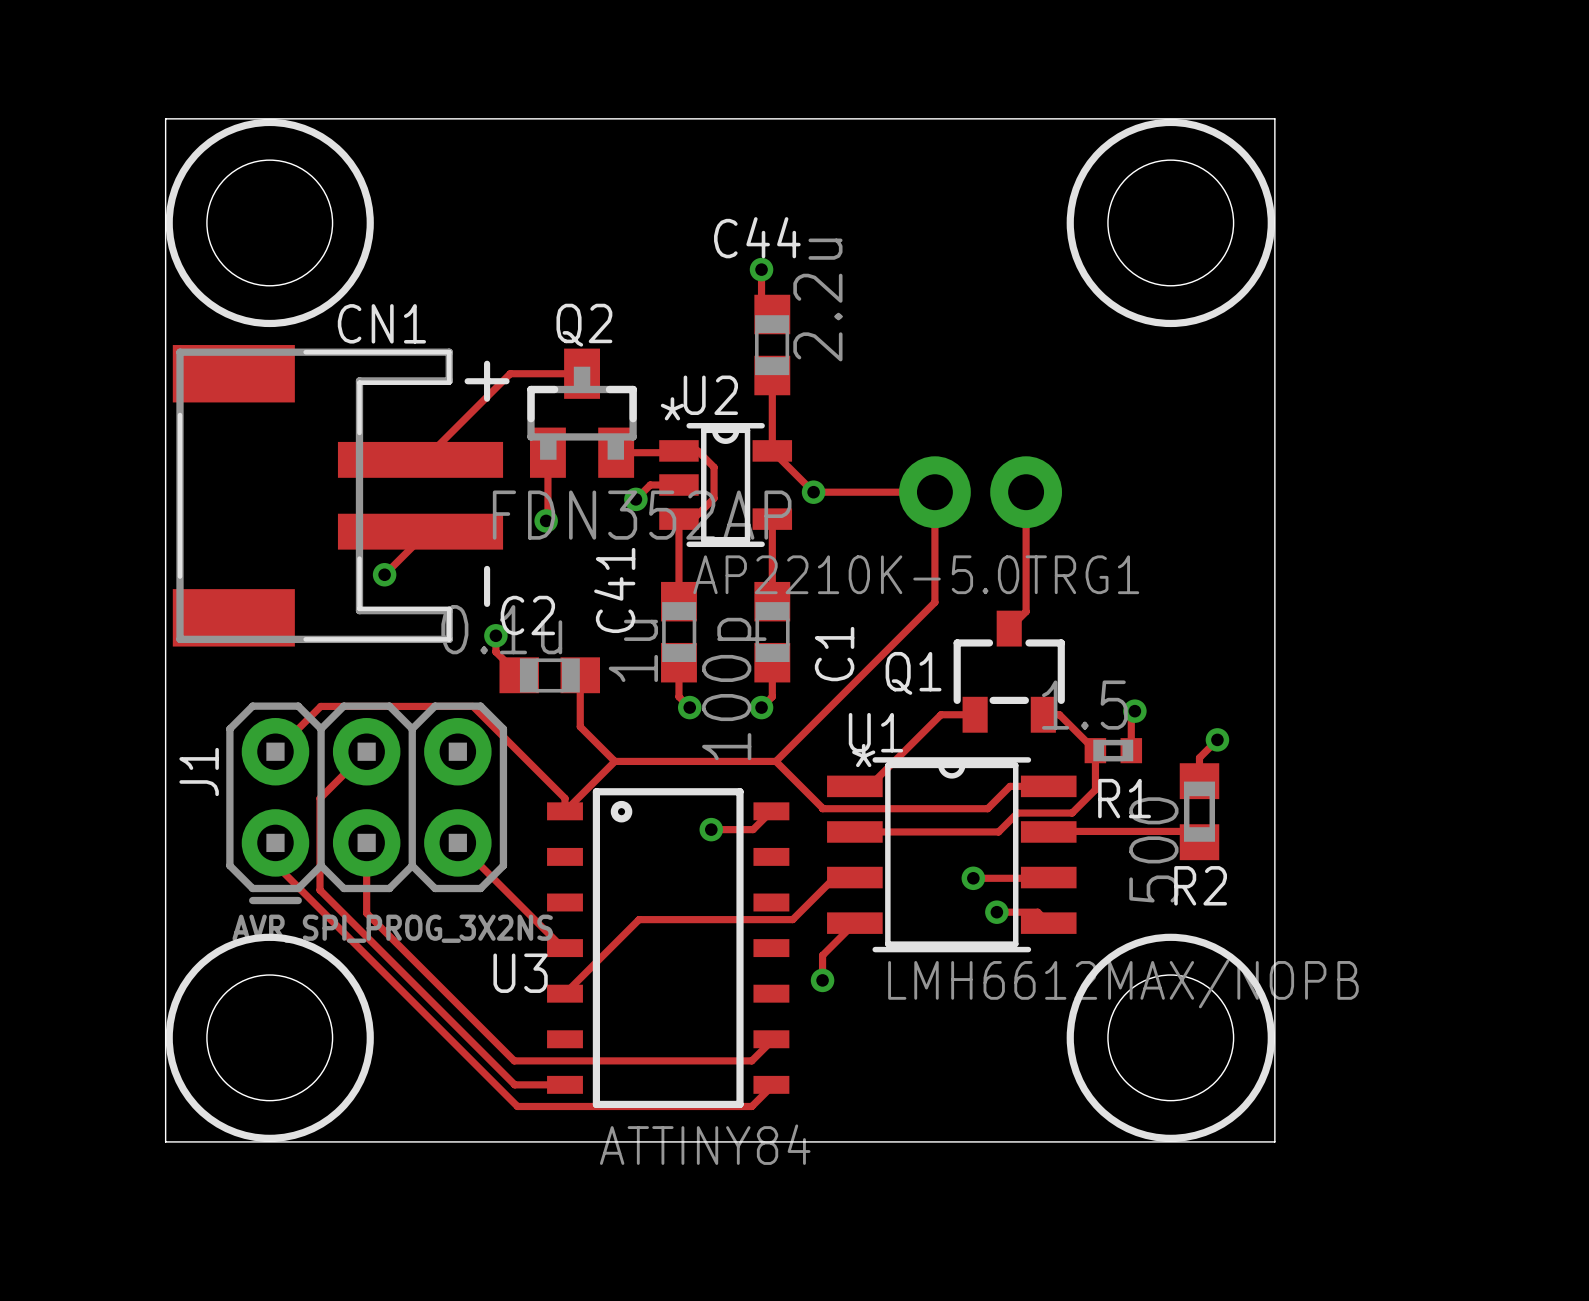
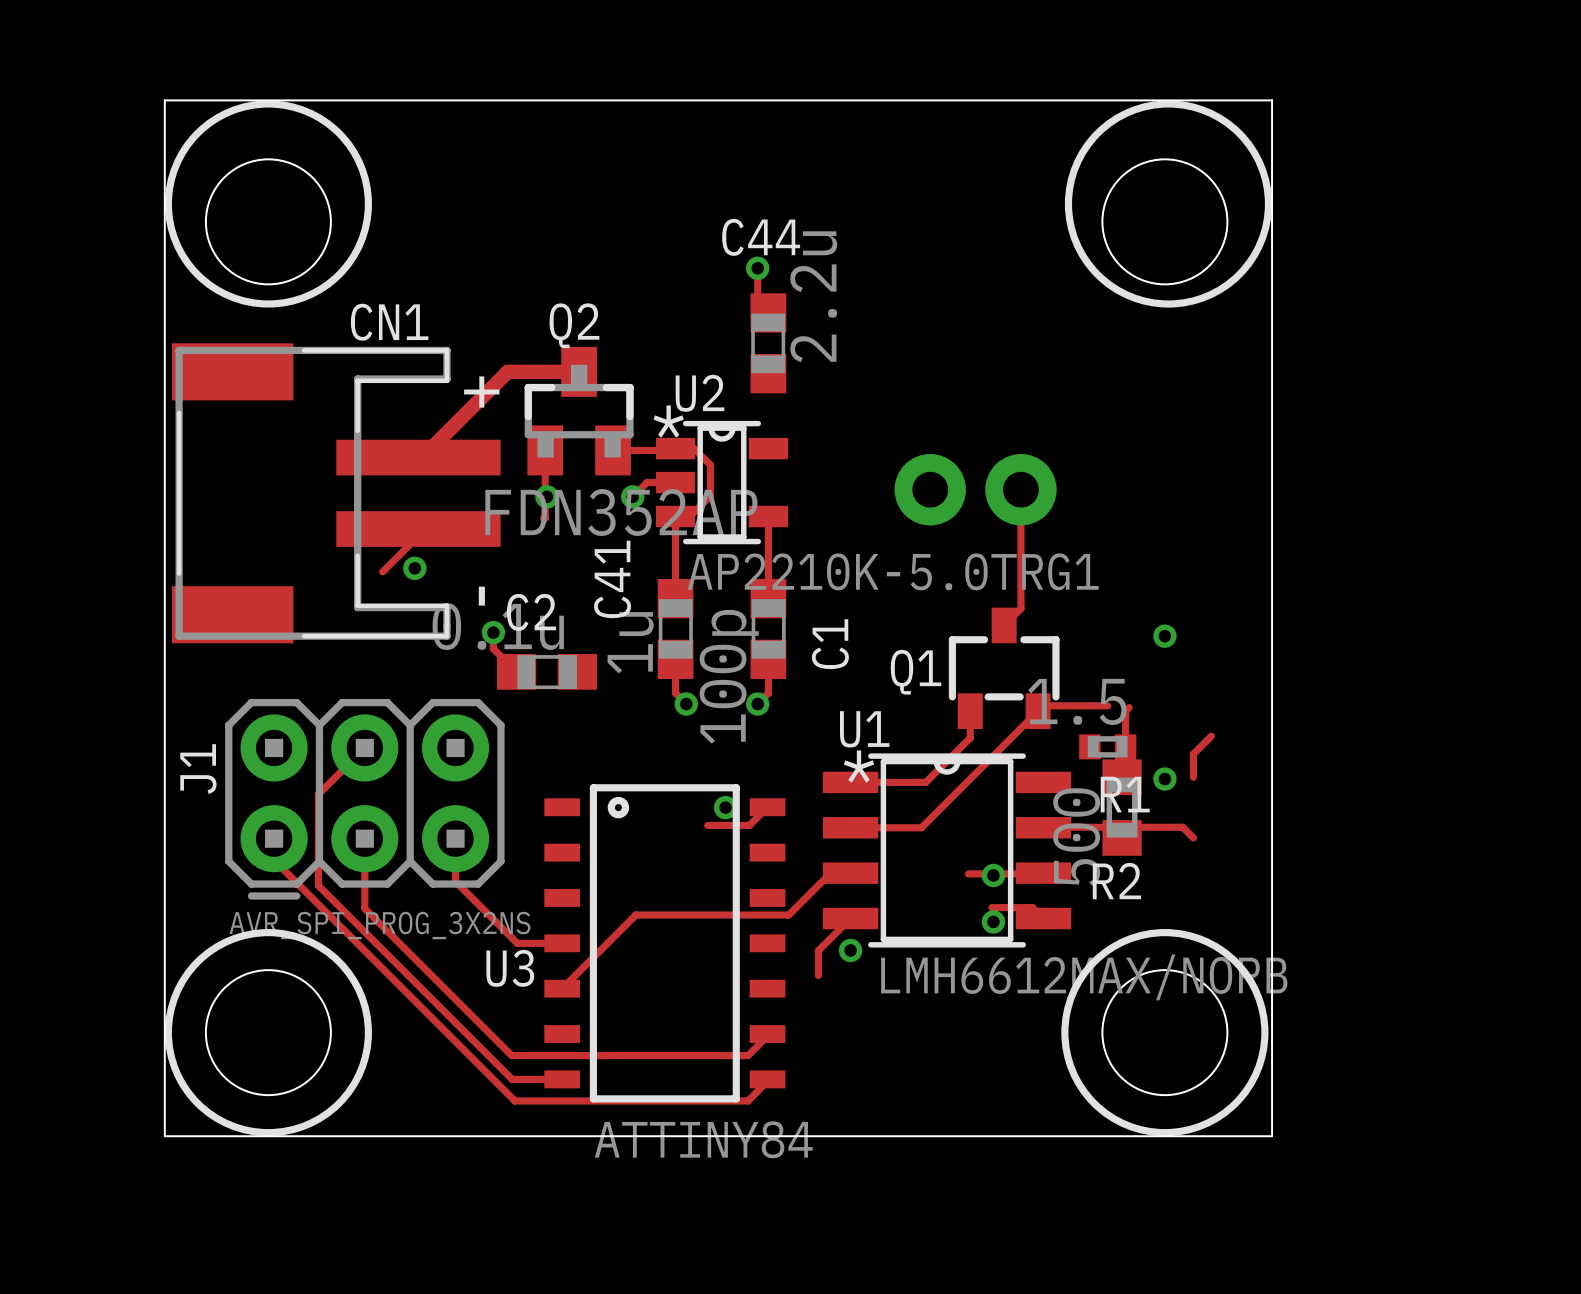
board edge: (165, 118) (1274, 118) (1274, 1141) -> (164, 118) (164, 100) (1272, 100) (1272, 1136) (1268, 1136)
drawing position: (269, 222) -> (268, 203)
drawing position: (1170, 222) -> (1168, 203)
track width: thin (582, 373) (510, 373) (424, 459) -> thick (579, 371) (507, 371) (421, 457)
track: (772, 375) (772, 450) (813, 492) (934, 492) (934, 602) (775, 761) -> none
via: (813, 492) -> none
via position: (546, 520) -> (546, 496)
via position: (384, 574) -> (414, 568)
via: none -> (1164, 636)
track: (580, 675) (580, 726) (614, 761) -> none
via: (1134, 711) -> none
track: (975, 714) (941, 714) (869, 786) -> (970, 711) (970, 737) (925, 782) (865, 782)
track: (1043, 714) (1059, 714) (1095, 750) (1095, 789) (1072, 813) (1017, 813) (998, 831) (926, 831) -> (1107, 705) (1043, 705) (921, 827)
via: (1217, 739) -> none
track: (275, 751) (320, 706) (473, 706) (565, 798) (565, 811) (614, 761) -> none
track: (614, 761) (775, 761) -> none
track: (775, 761) (822, 808) -> none
via: none -> (1164, 779)
track: (1048, 786) (1010, 786) (987, 808) (822, 808) -> none
R2 position: (1199, 811) -> (1122, 807)
via position: (711, 829) -> (725, 807)
track: (457, 842) (563, 948) -> (455, 838) (455, 881) (517, 943) (560, 943)
via: (973, 878) -> none
via: none -> (993, 875)
via position: (996, 912) -> (993, 921)
via position: (822, 980) -> (850, 950)

